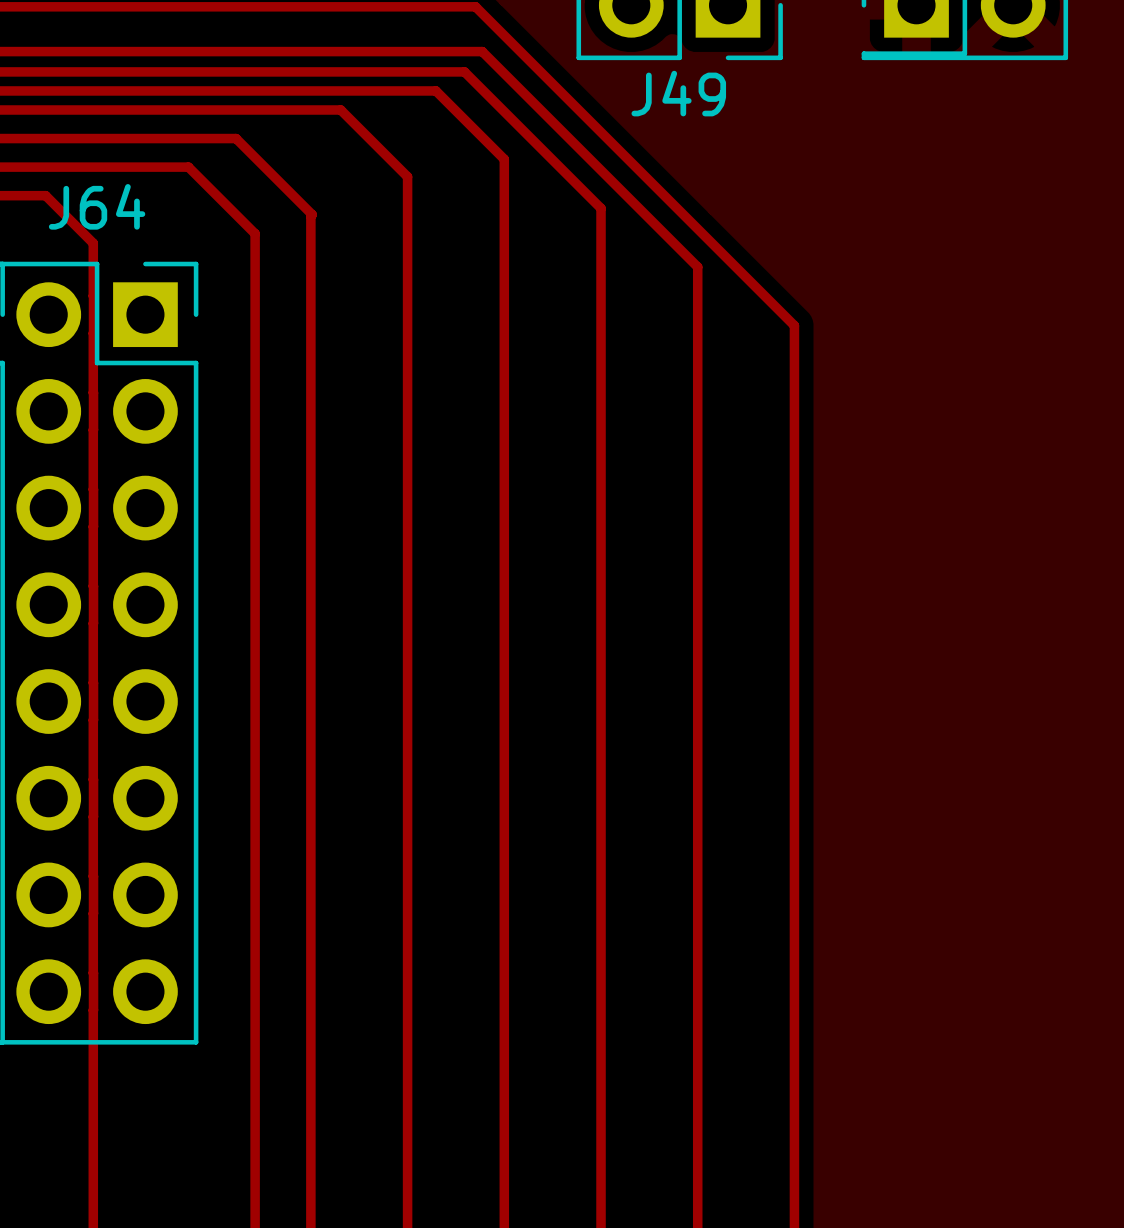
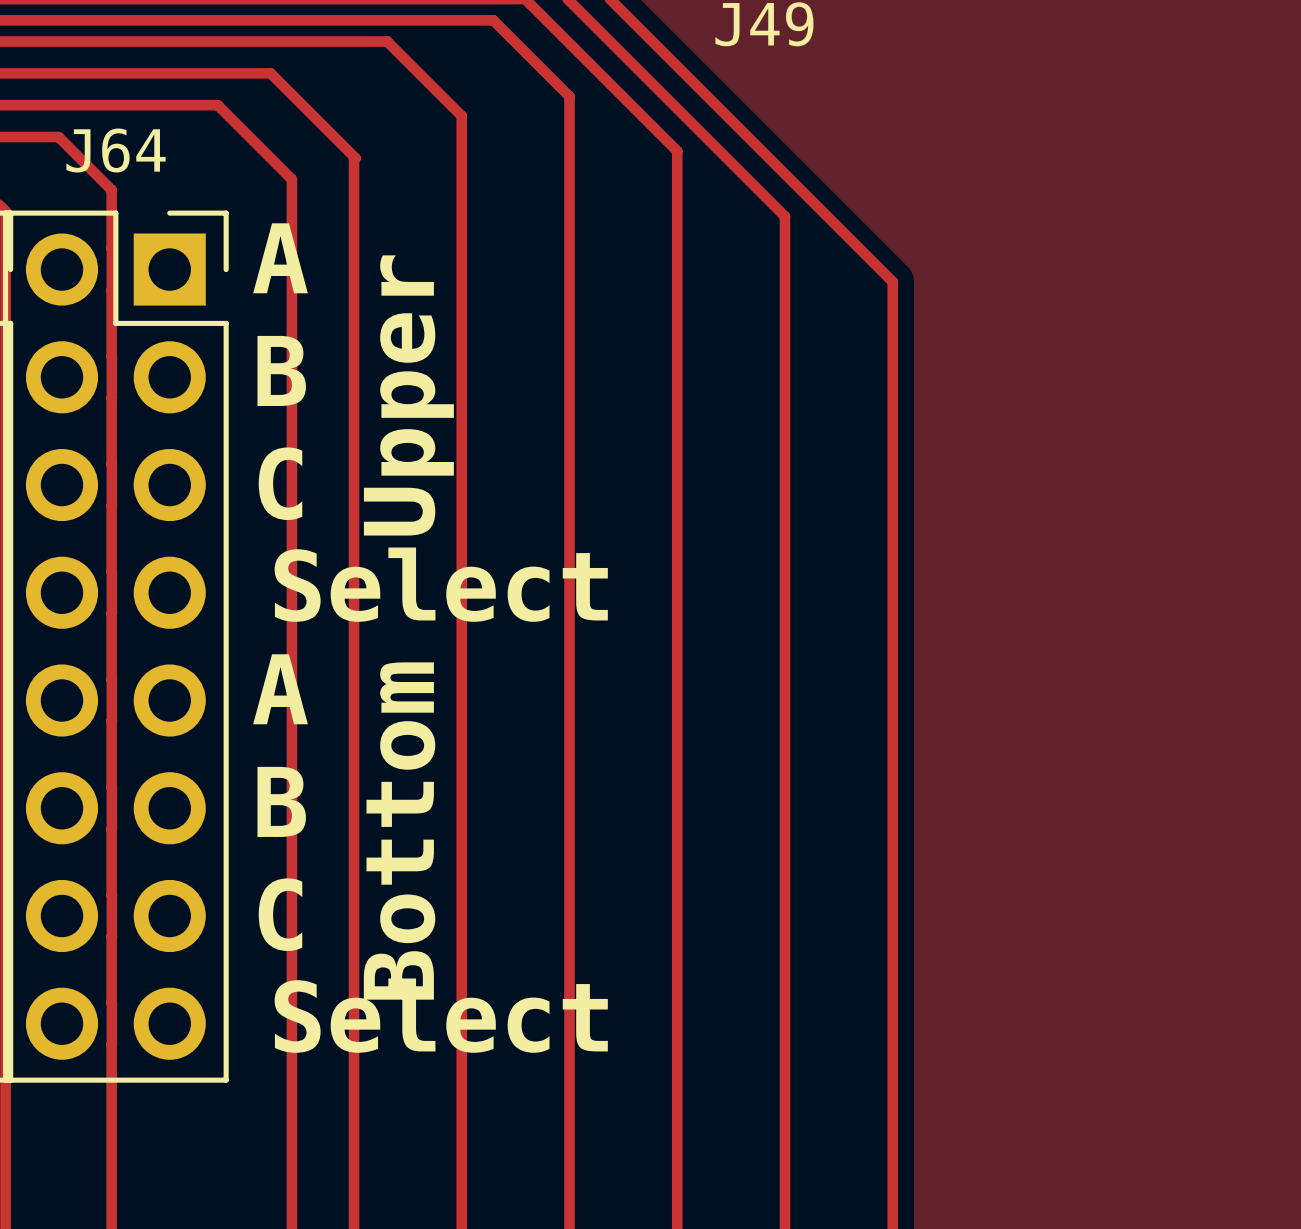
text: none -> A (280, 258)
text: none -> B (281, 370)
text: none -> Upper (408, 395)
text: none -> C (280, 483)
text: none -> Select (441, 584)
text: none -> A (280, 689)
text: none -> B (281, 801)
text: none -> Bottom (399, 831)
text: none -> C (280, 914)
text: none -> Select (441, 1015)

